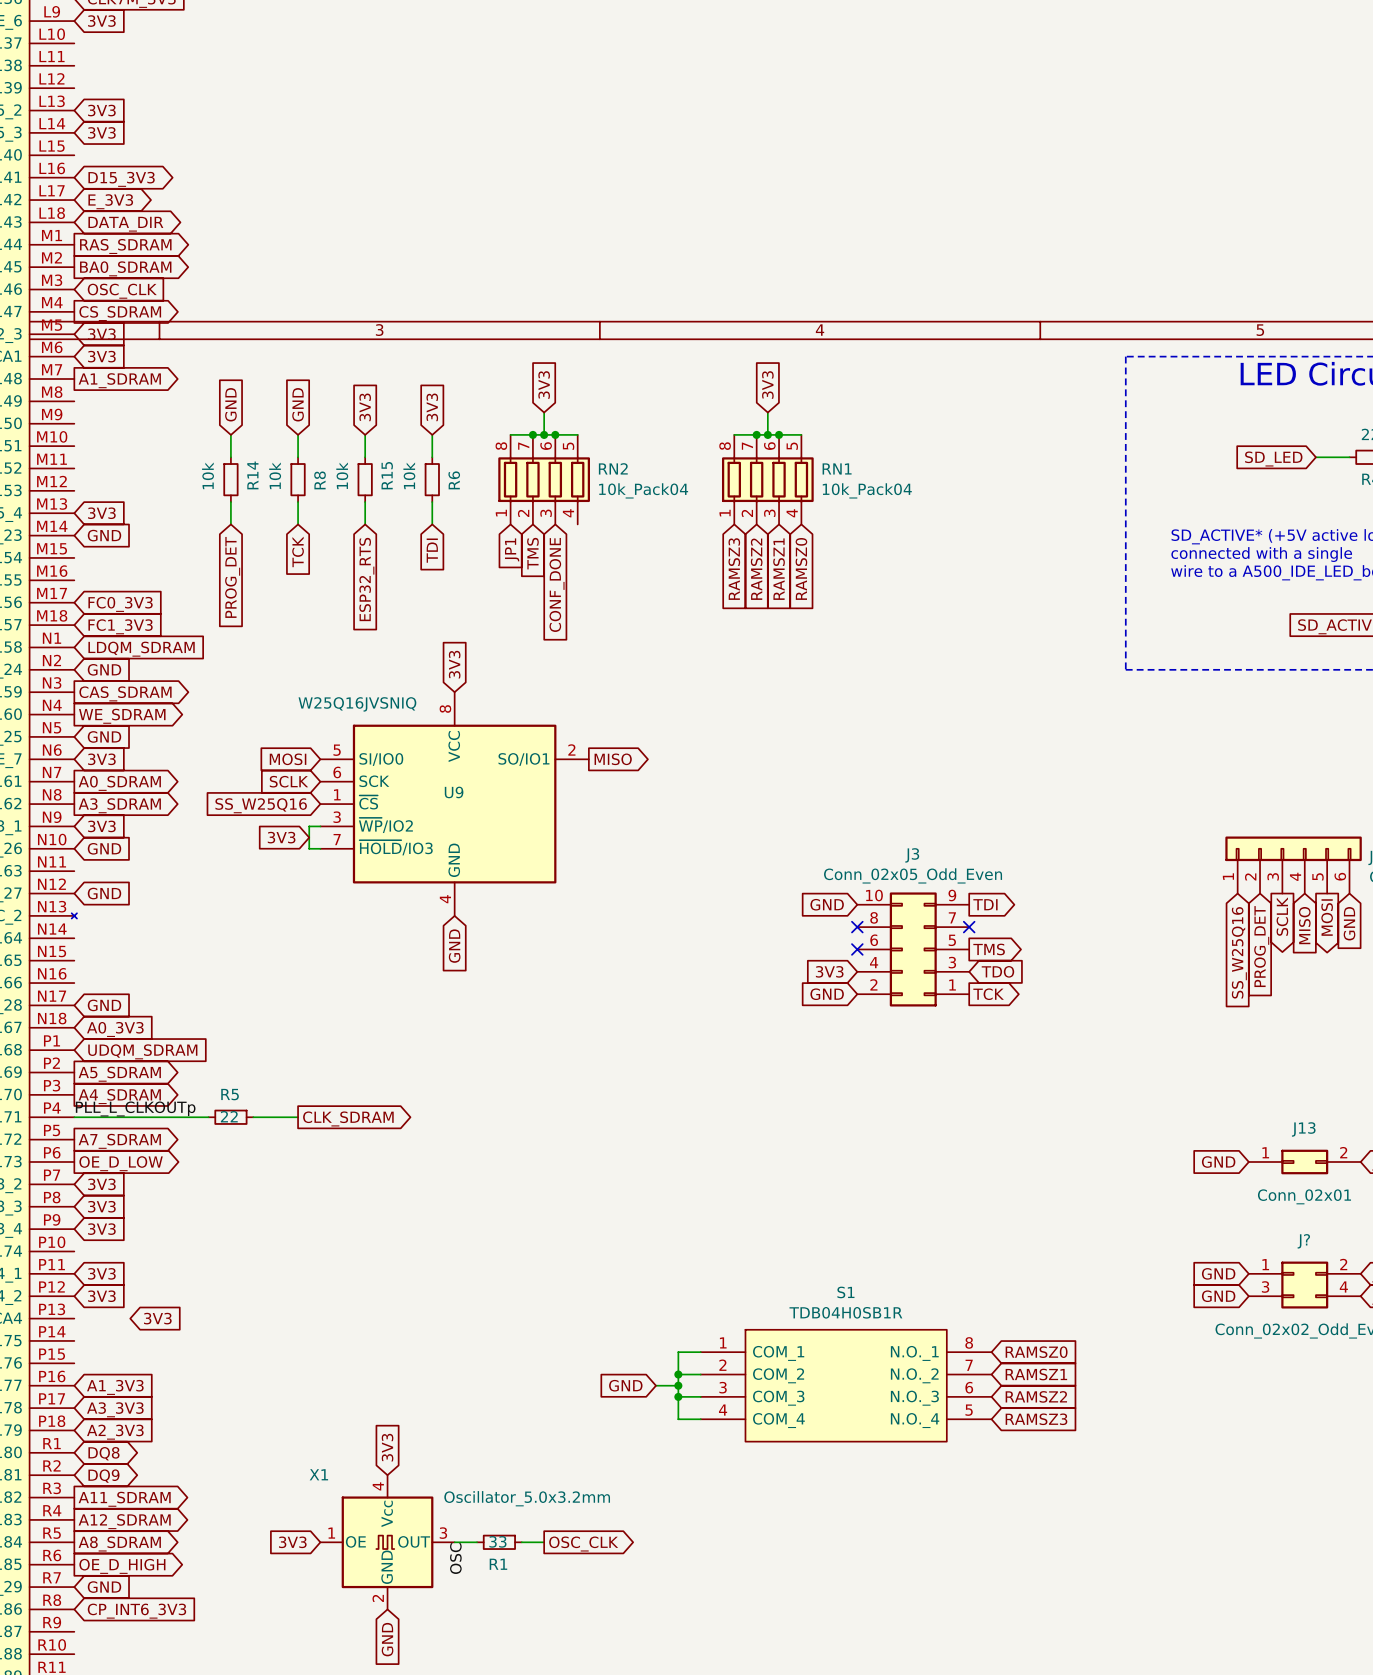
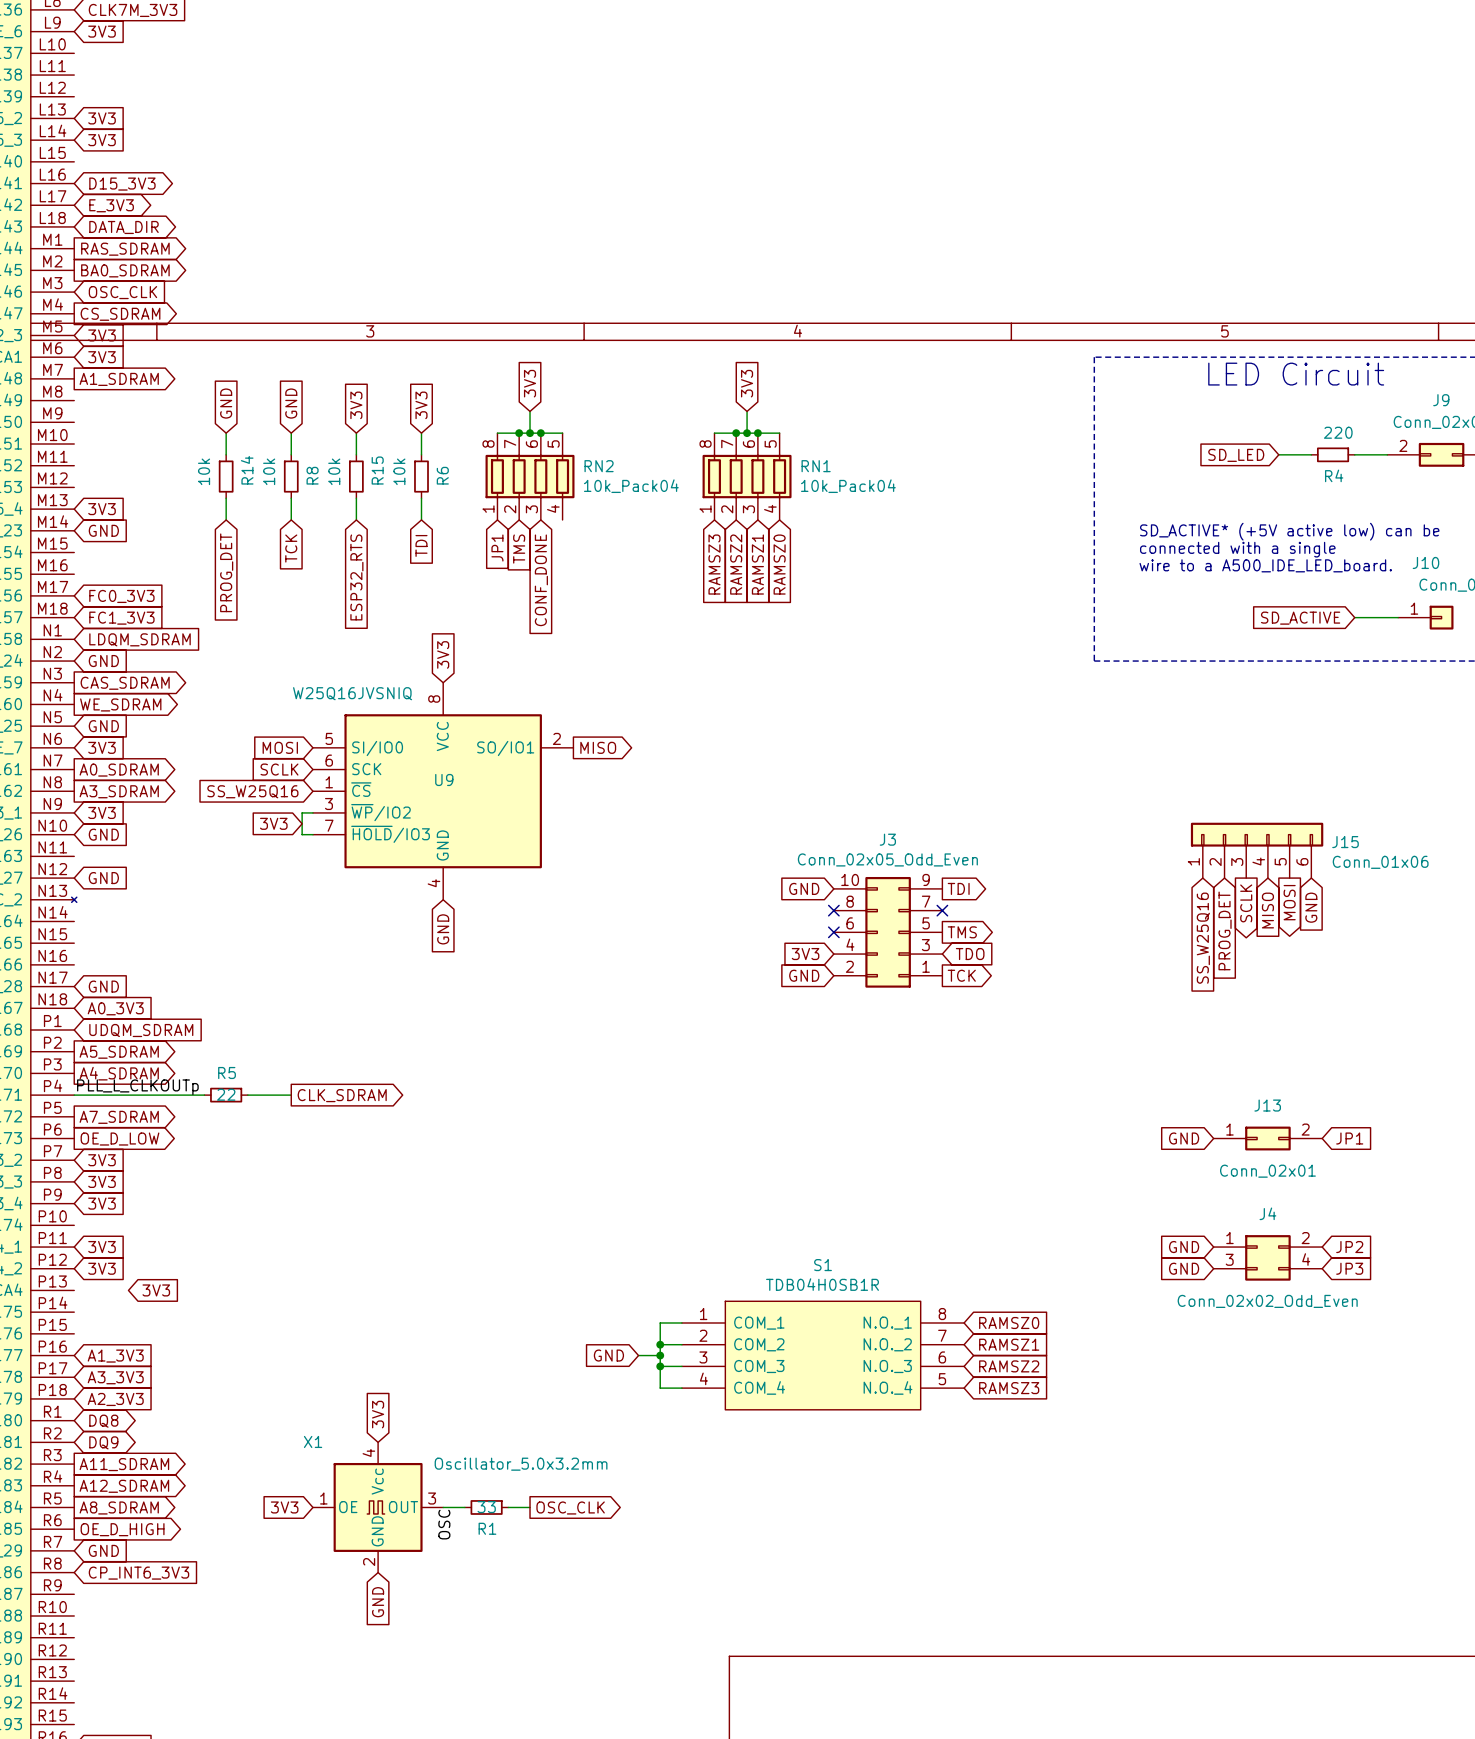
J? name: J? (1303, 1241) -> J4 (1267, 1213)

